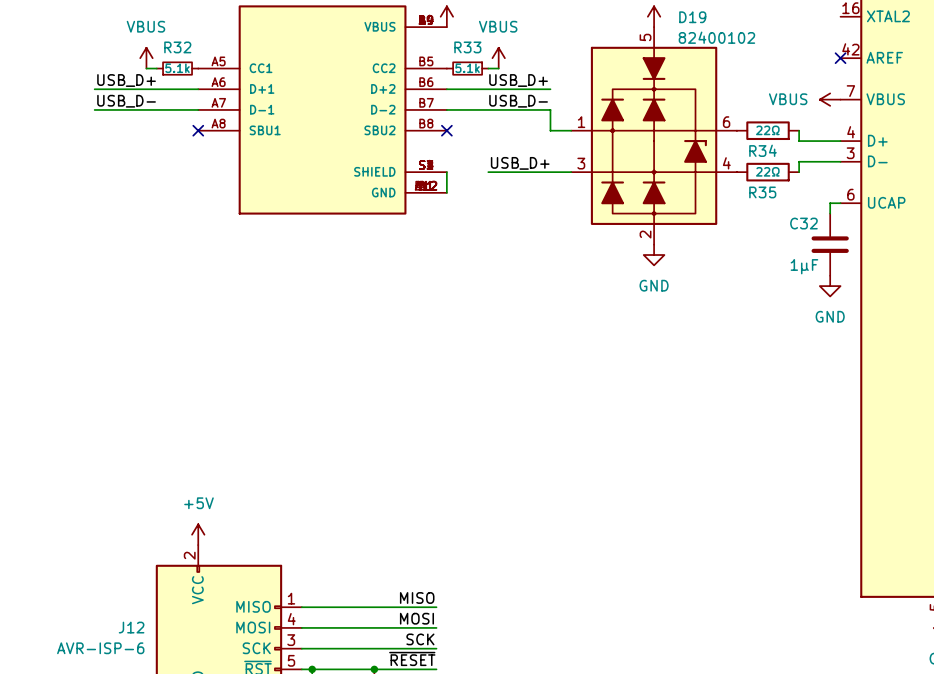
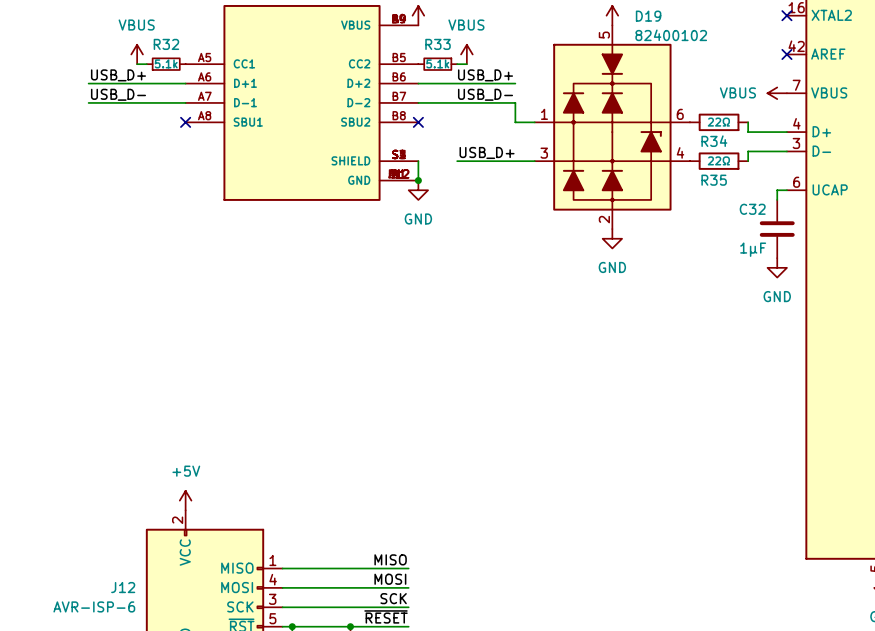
no-connect mark: none -> (786, 15)
junction: none -> (418, 180)
power symbol: none -> GND (418, 190)

